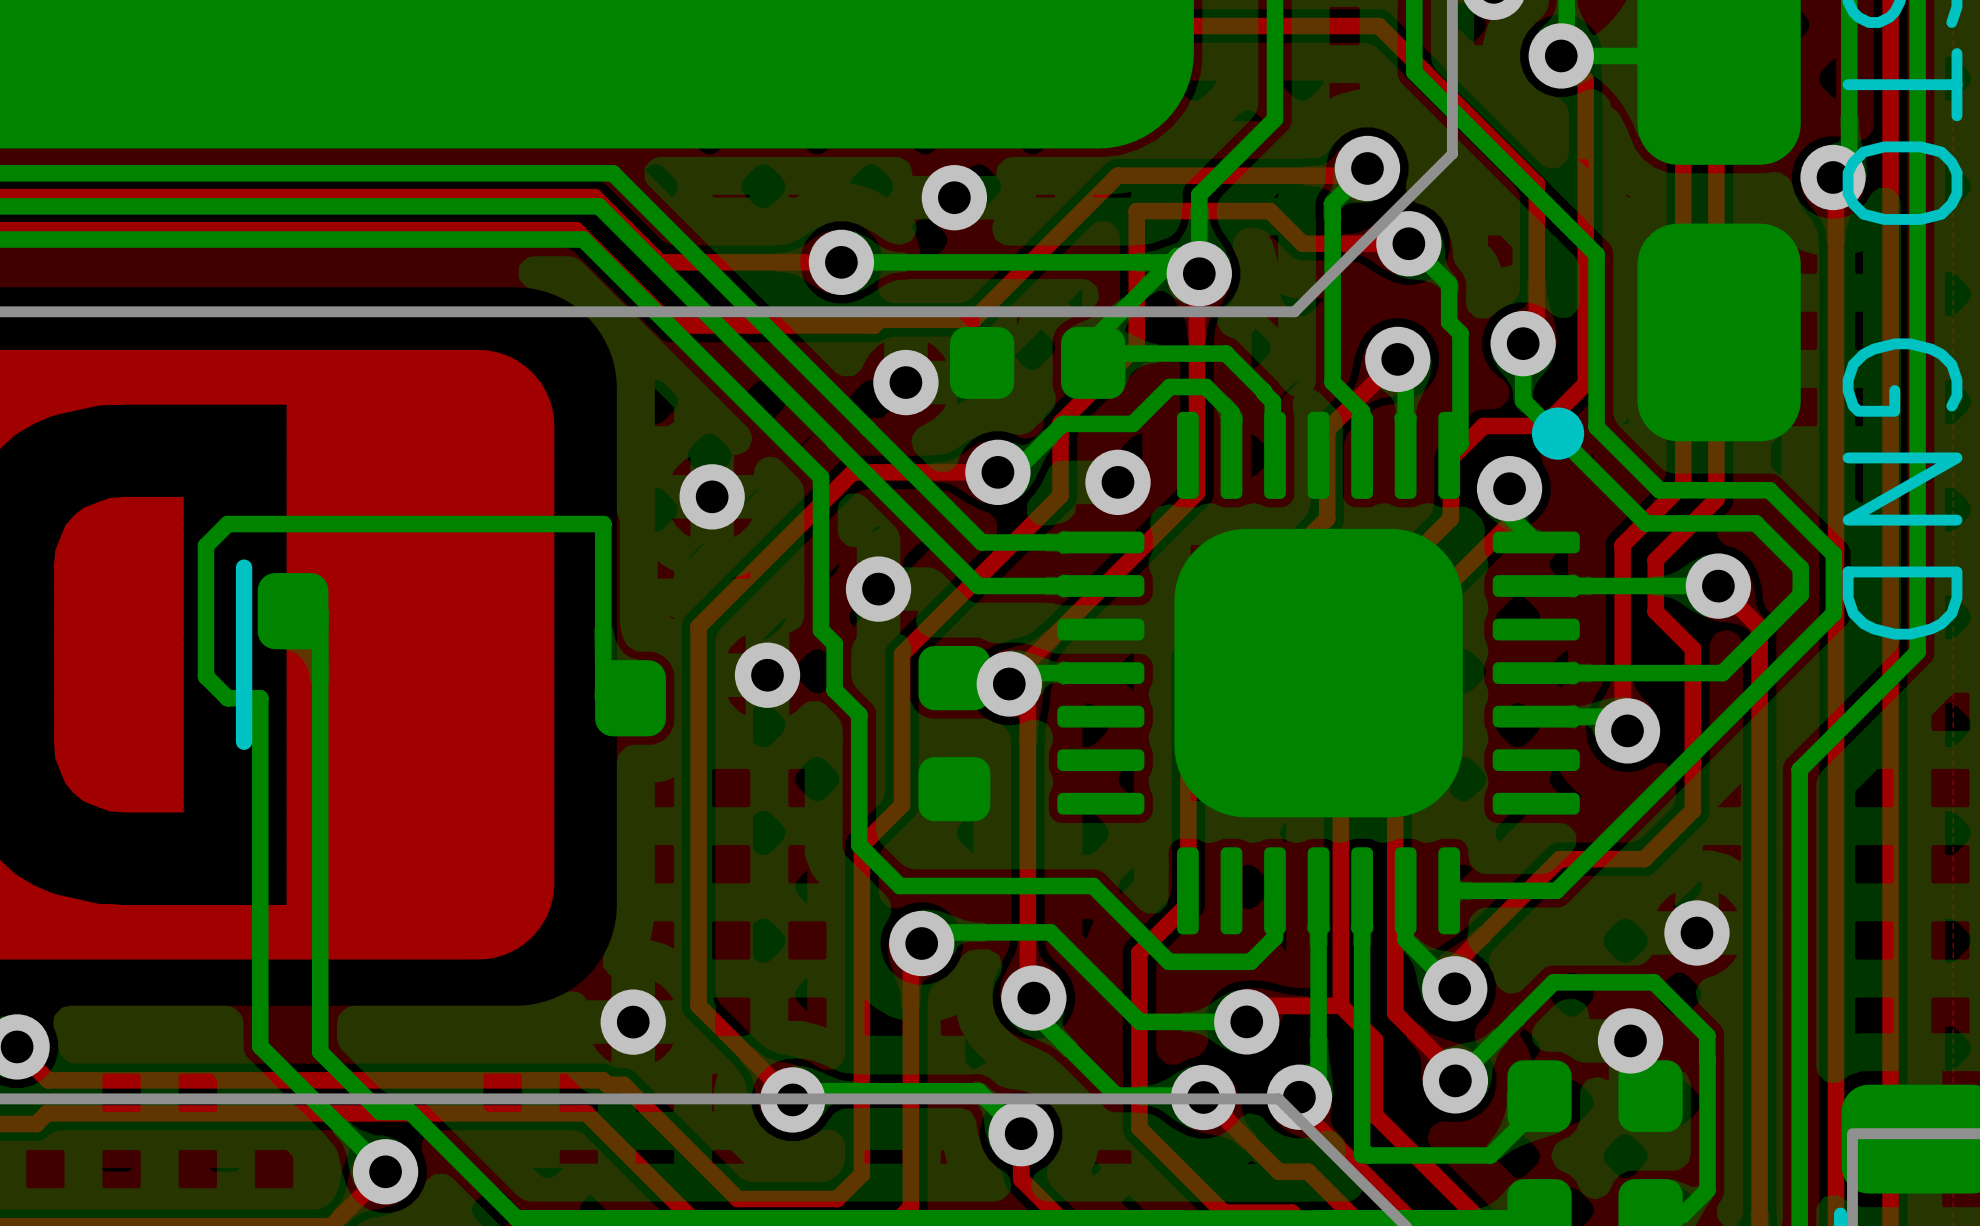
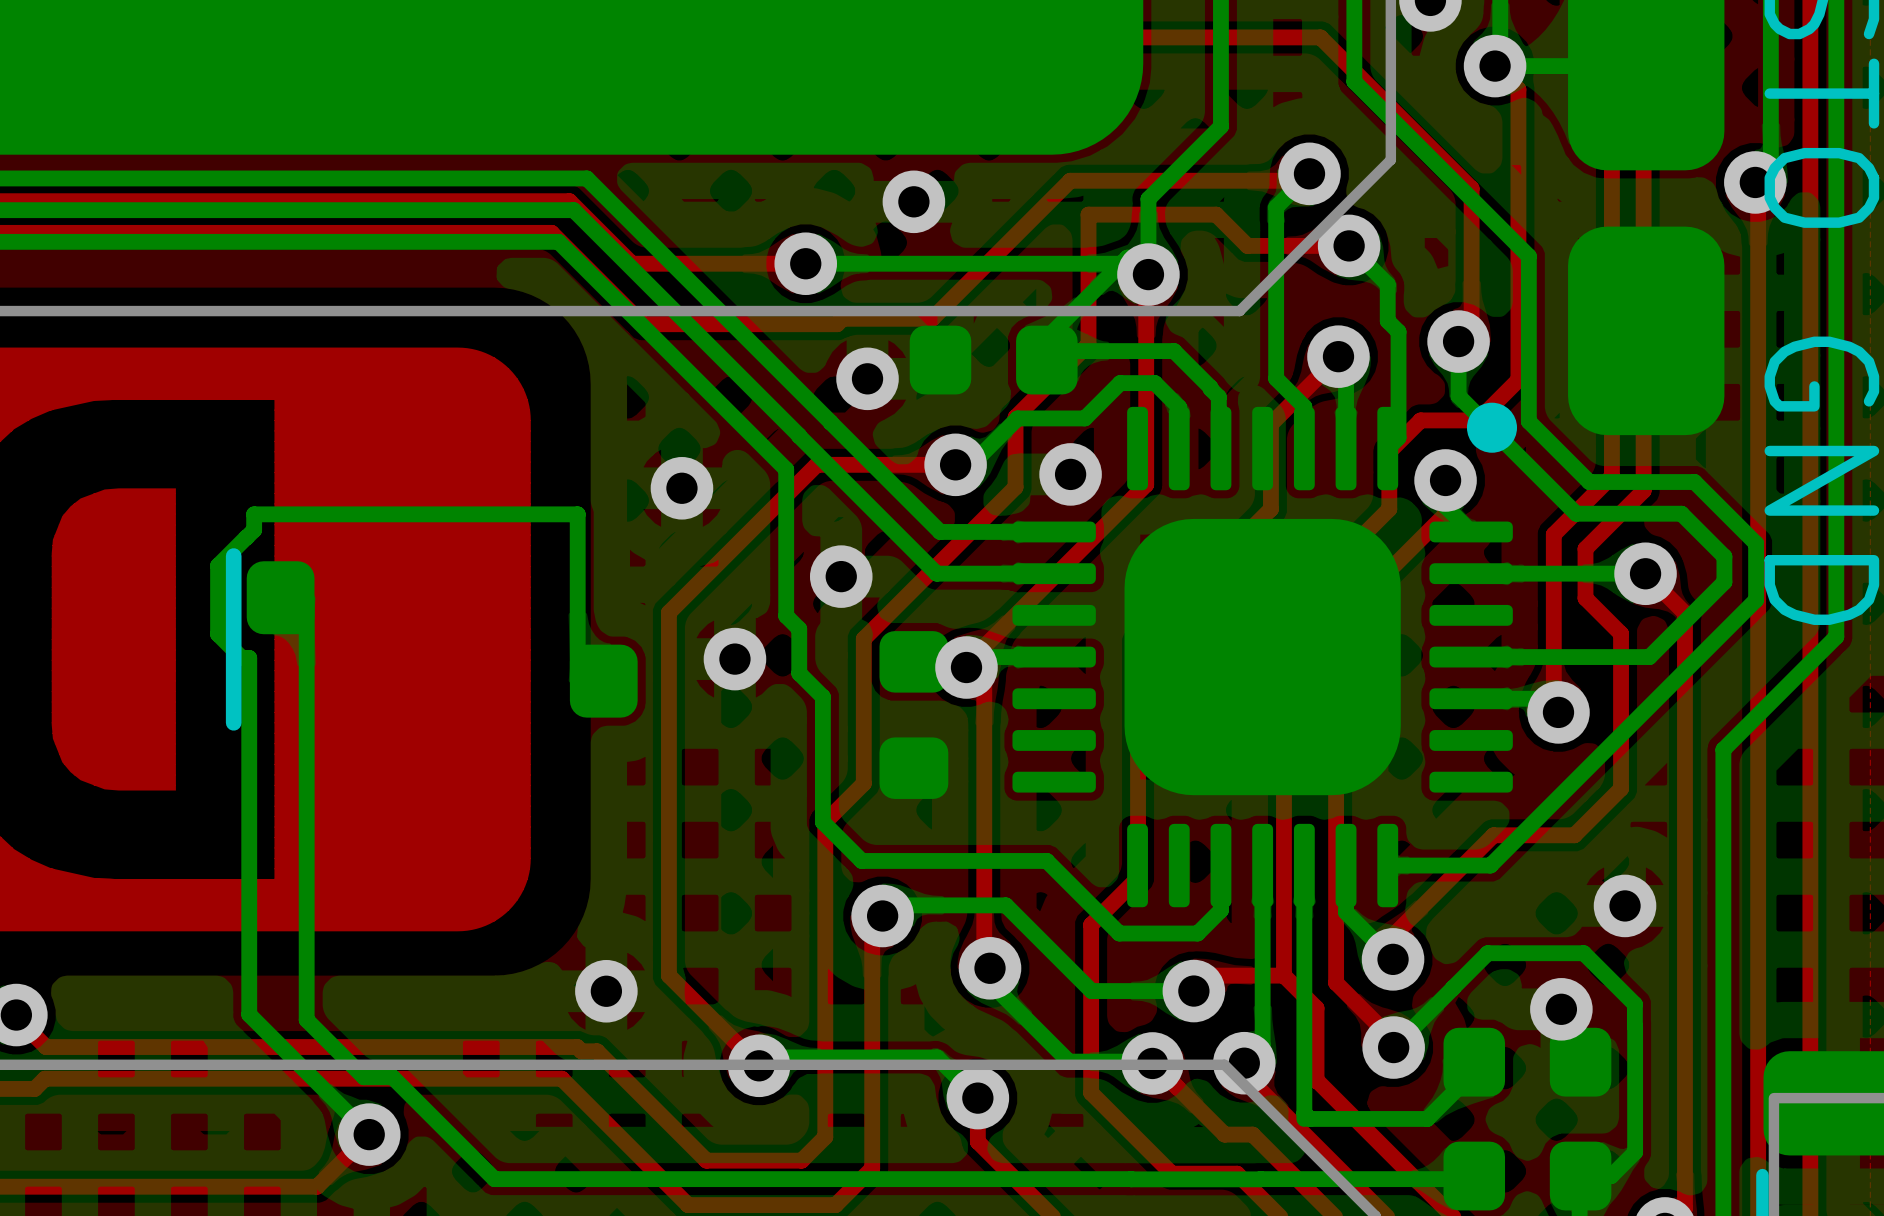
bottom track: (265, 524) (227, 524) (205, 545) (205, 676) (227, 698) (260, 698) -> (254, 514) (254, 529) (218, 565) (218, 634) (241, 657) (249, 657) (249, 681)

